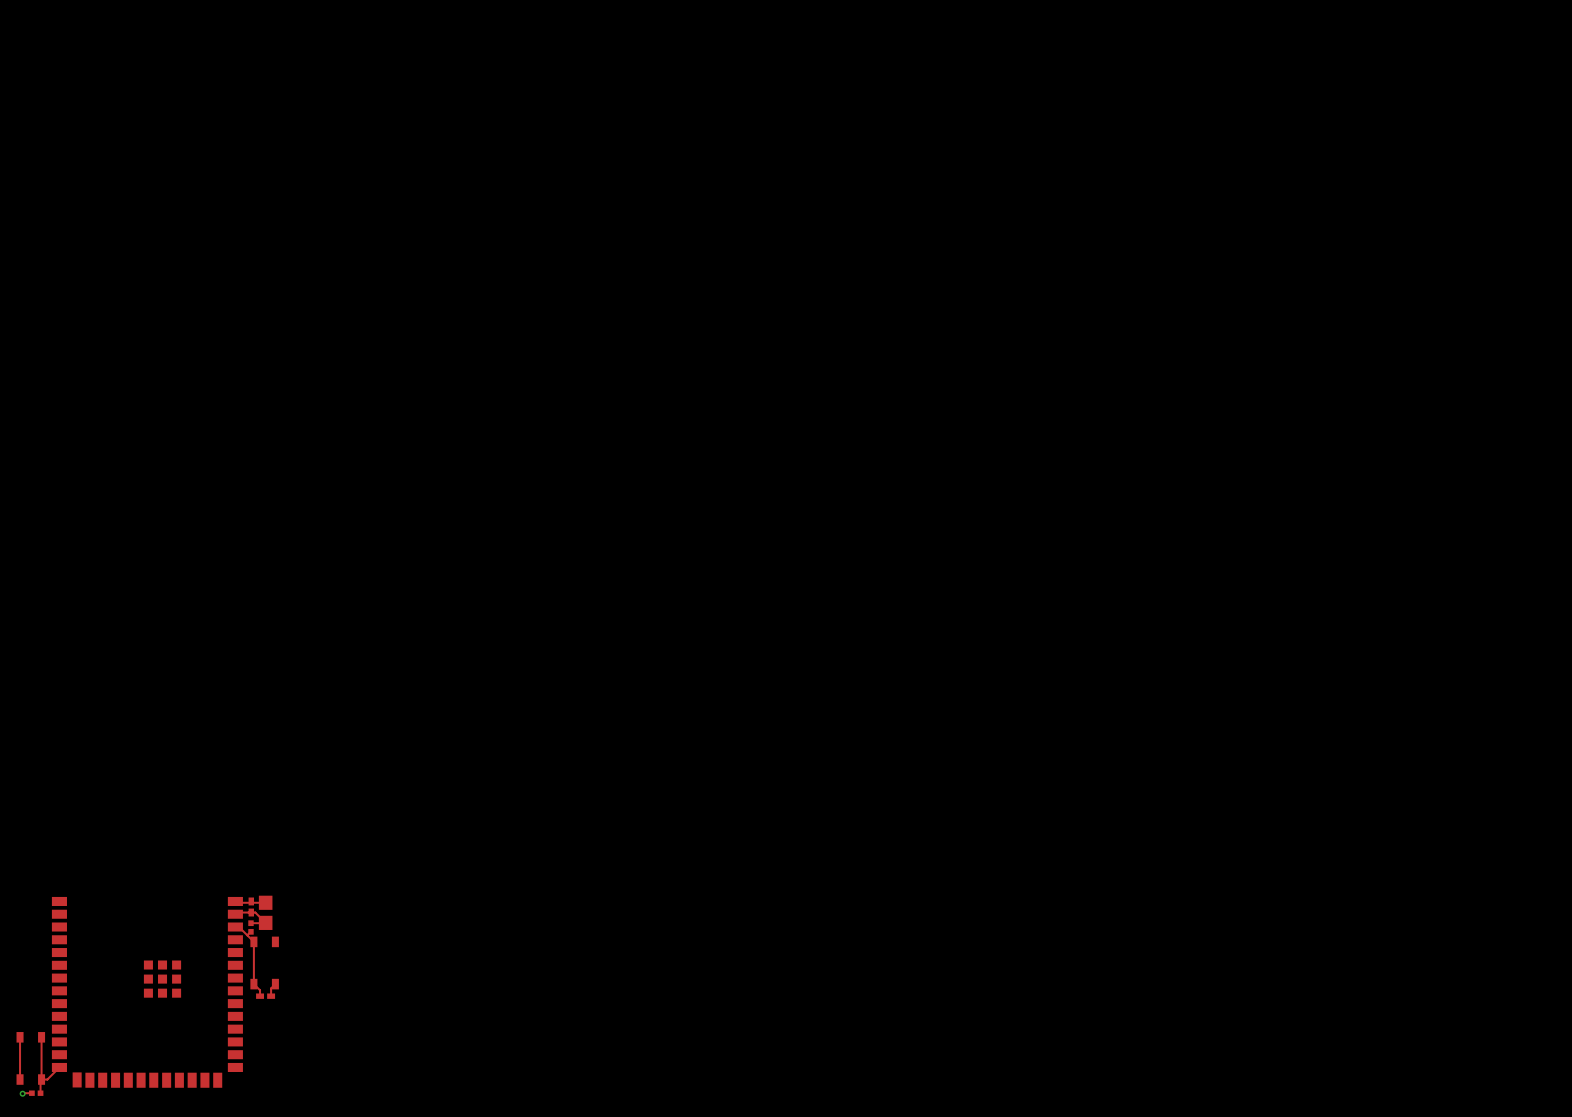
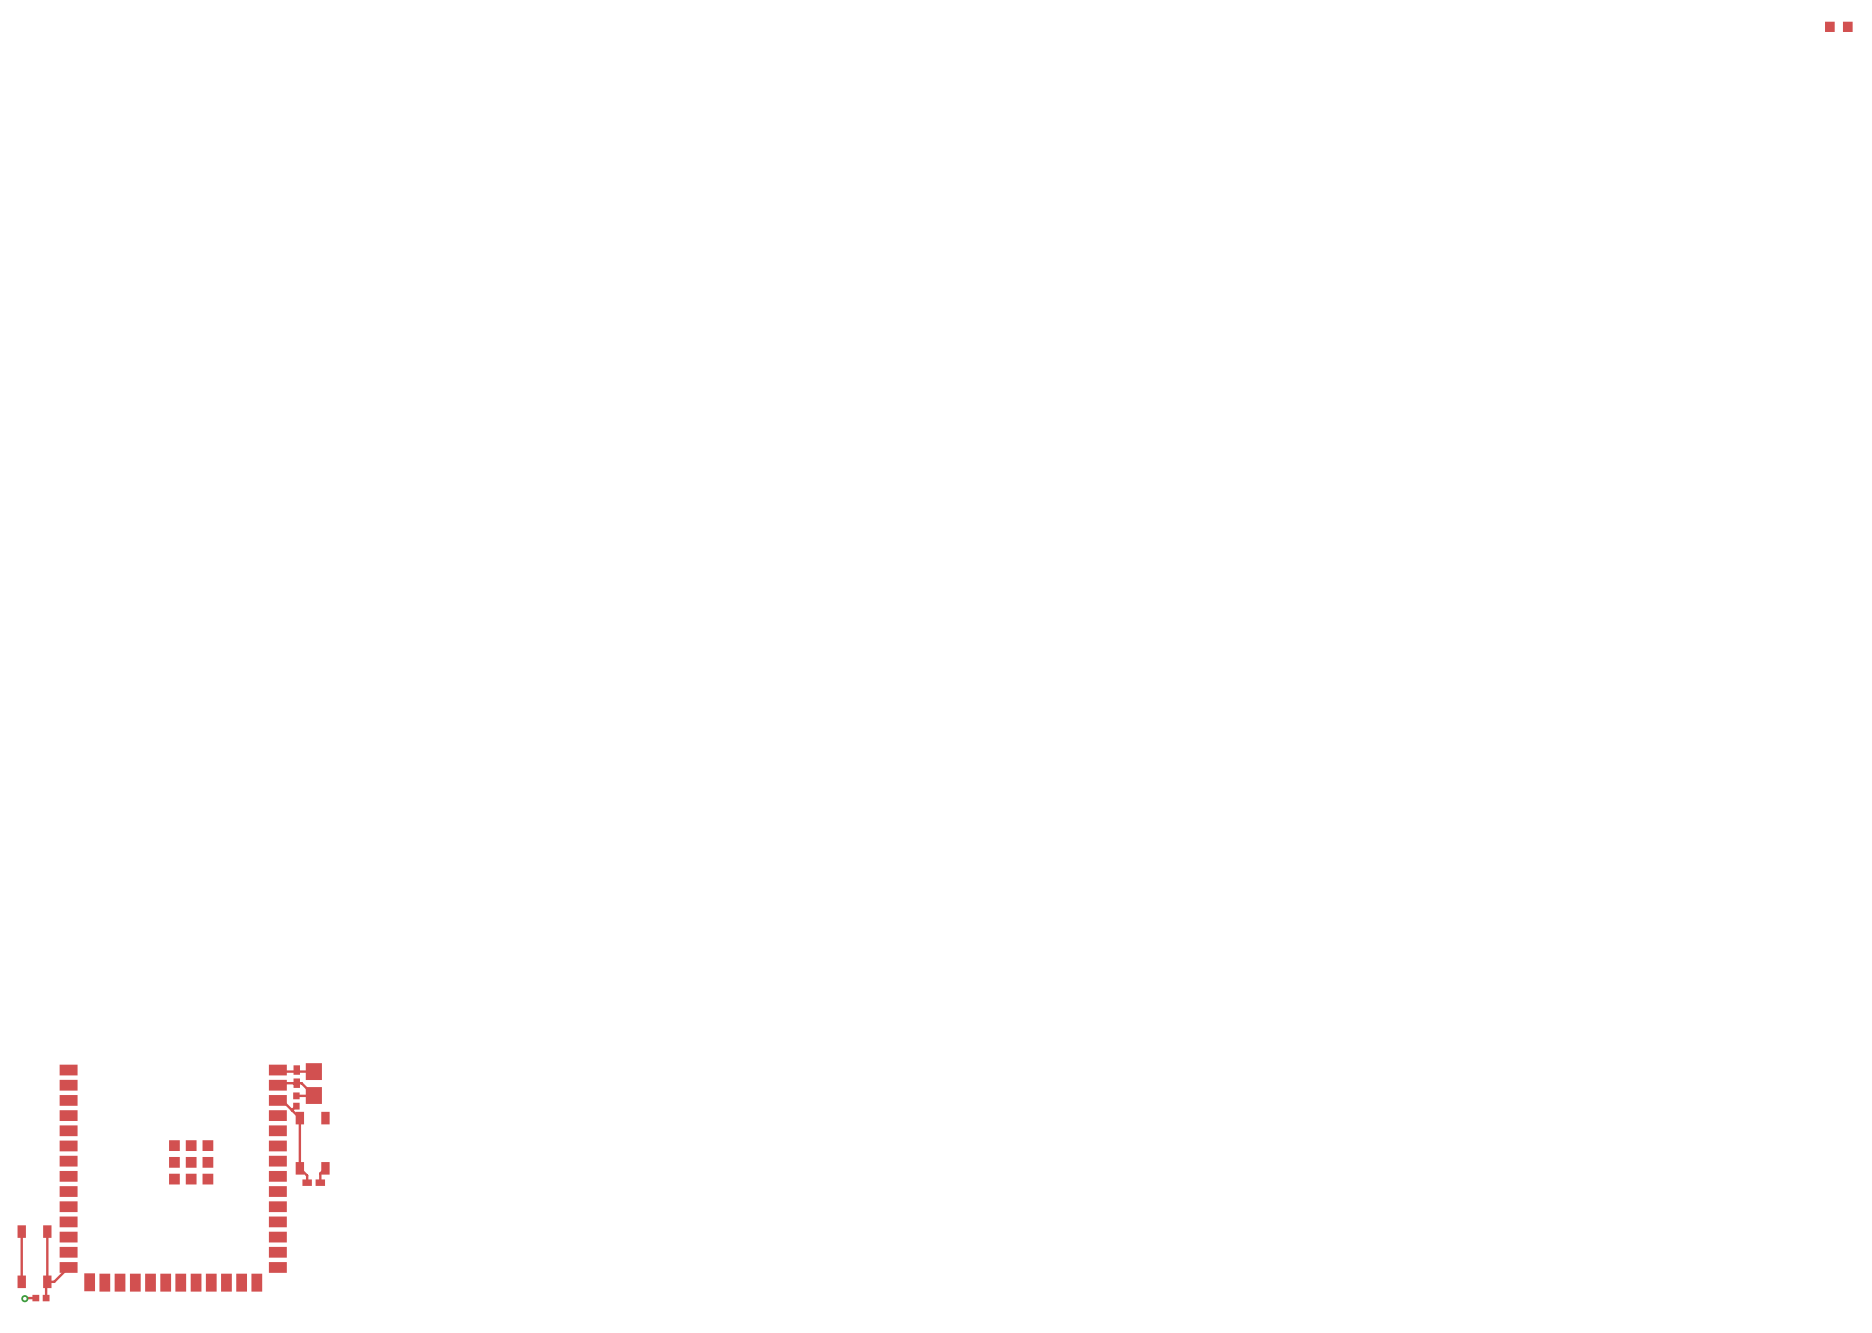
part: none -> (1838, 26)

